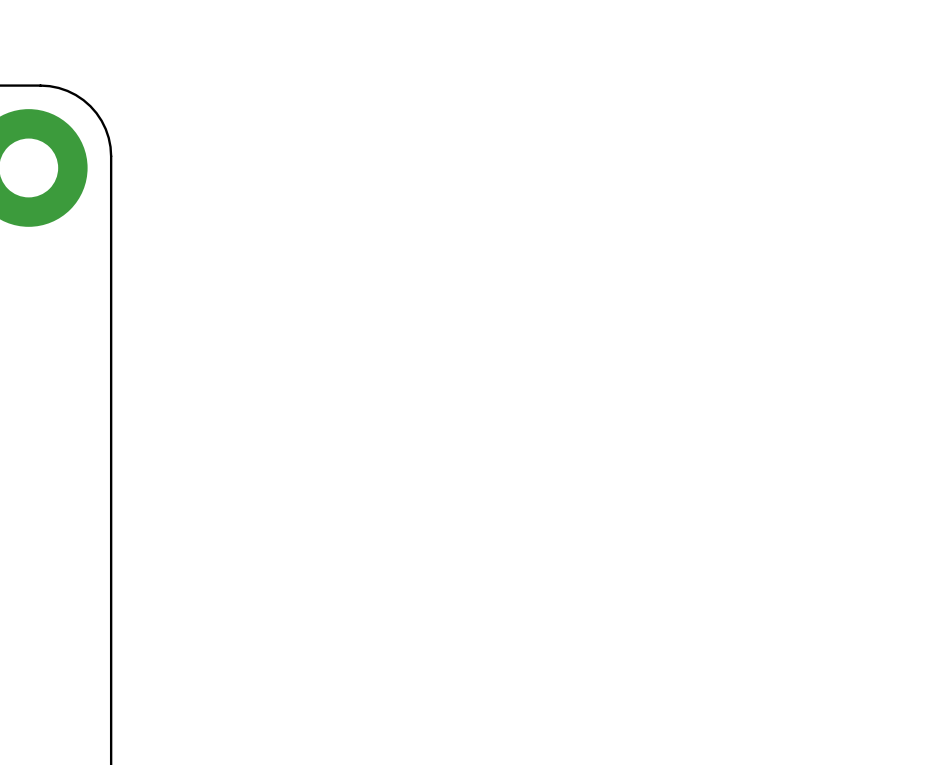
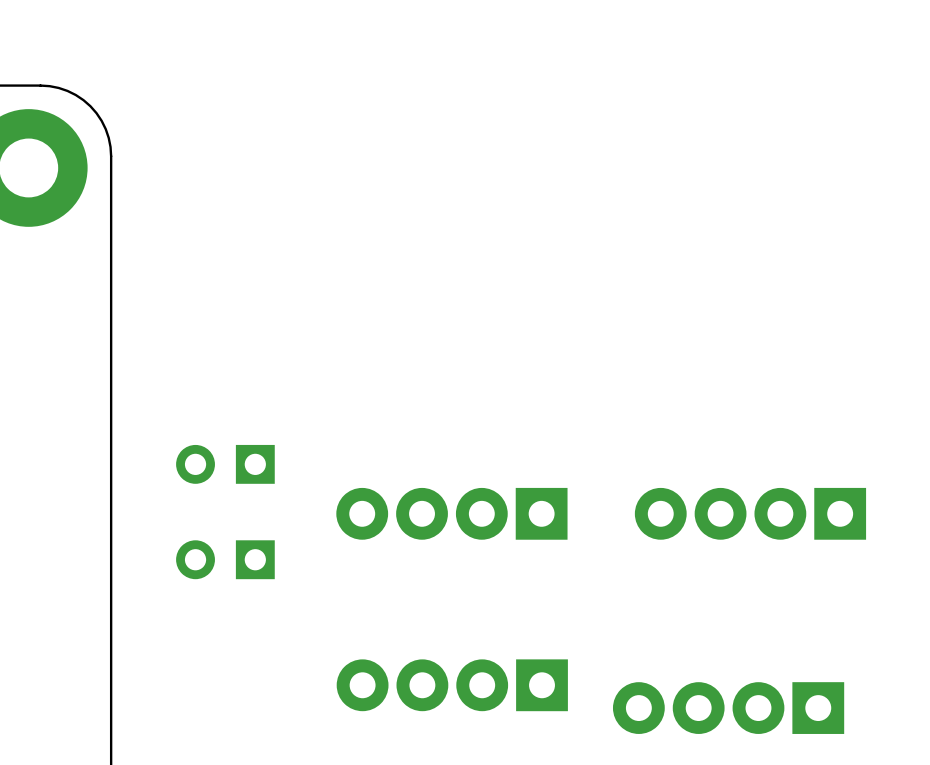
part: none -> (225, 464)
part: none -> (451, 513)
part: none -> (750, 513)
part: none -> (225, 559)
part: none -> (452, 685)
part: none -> (728, 708)

